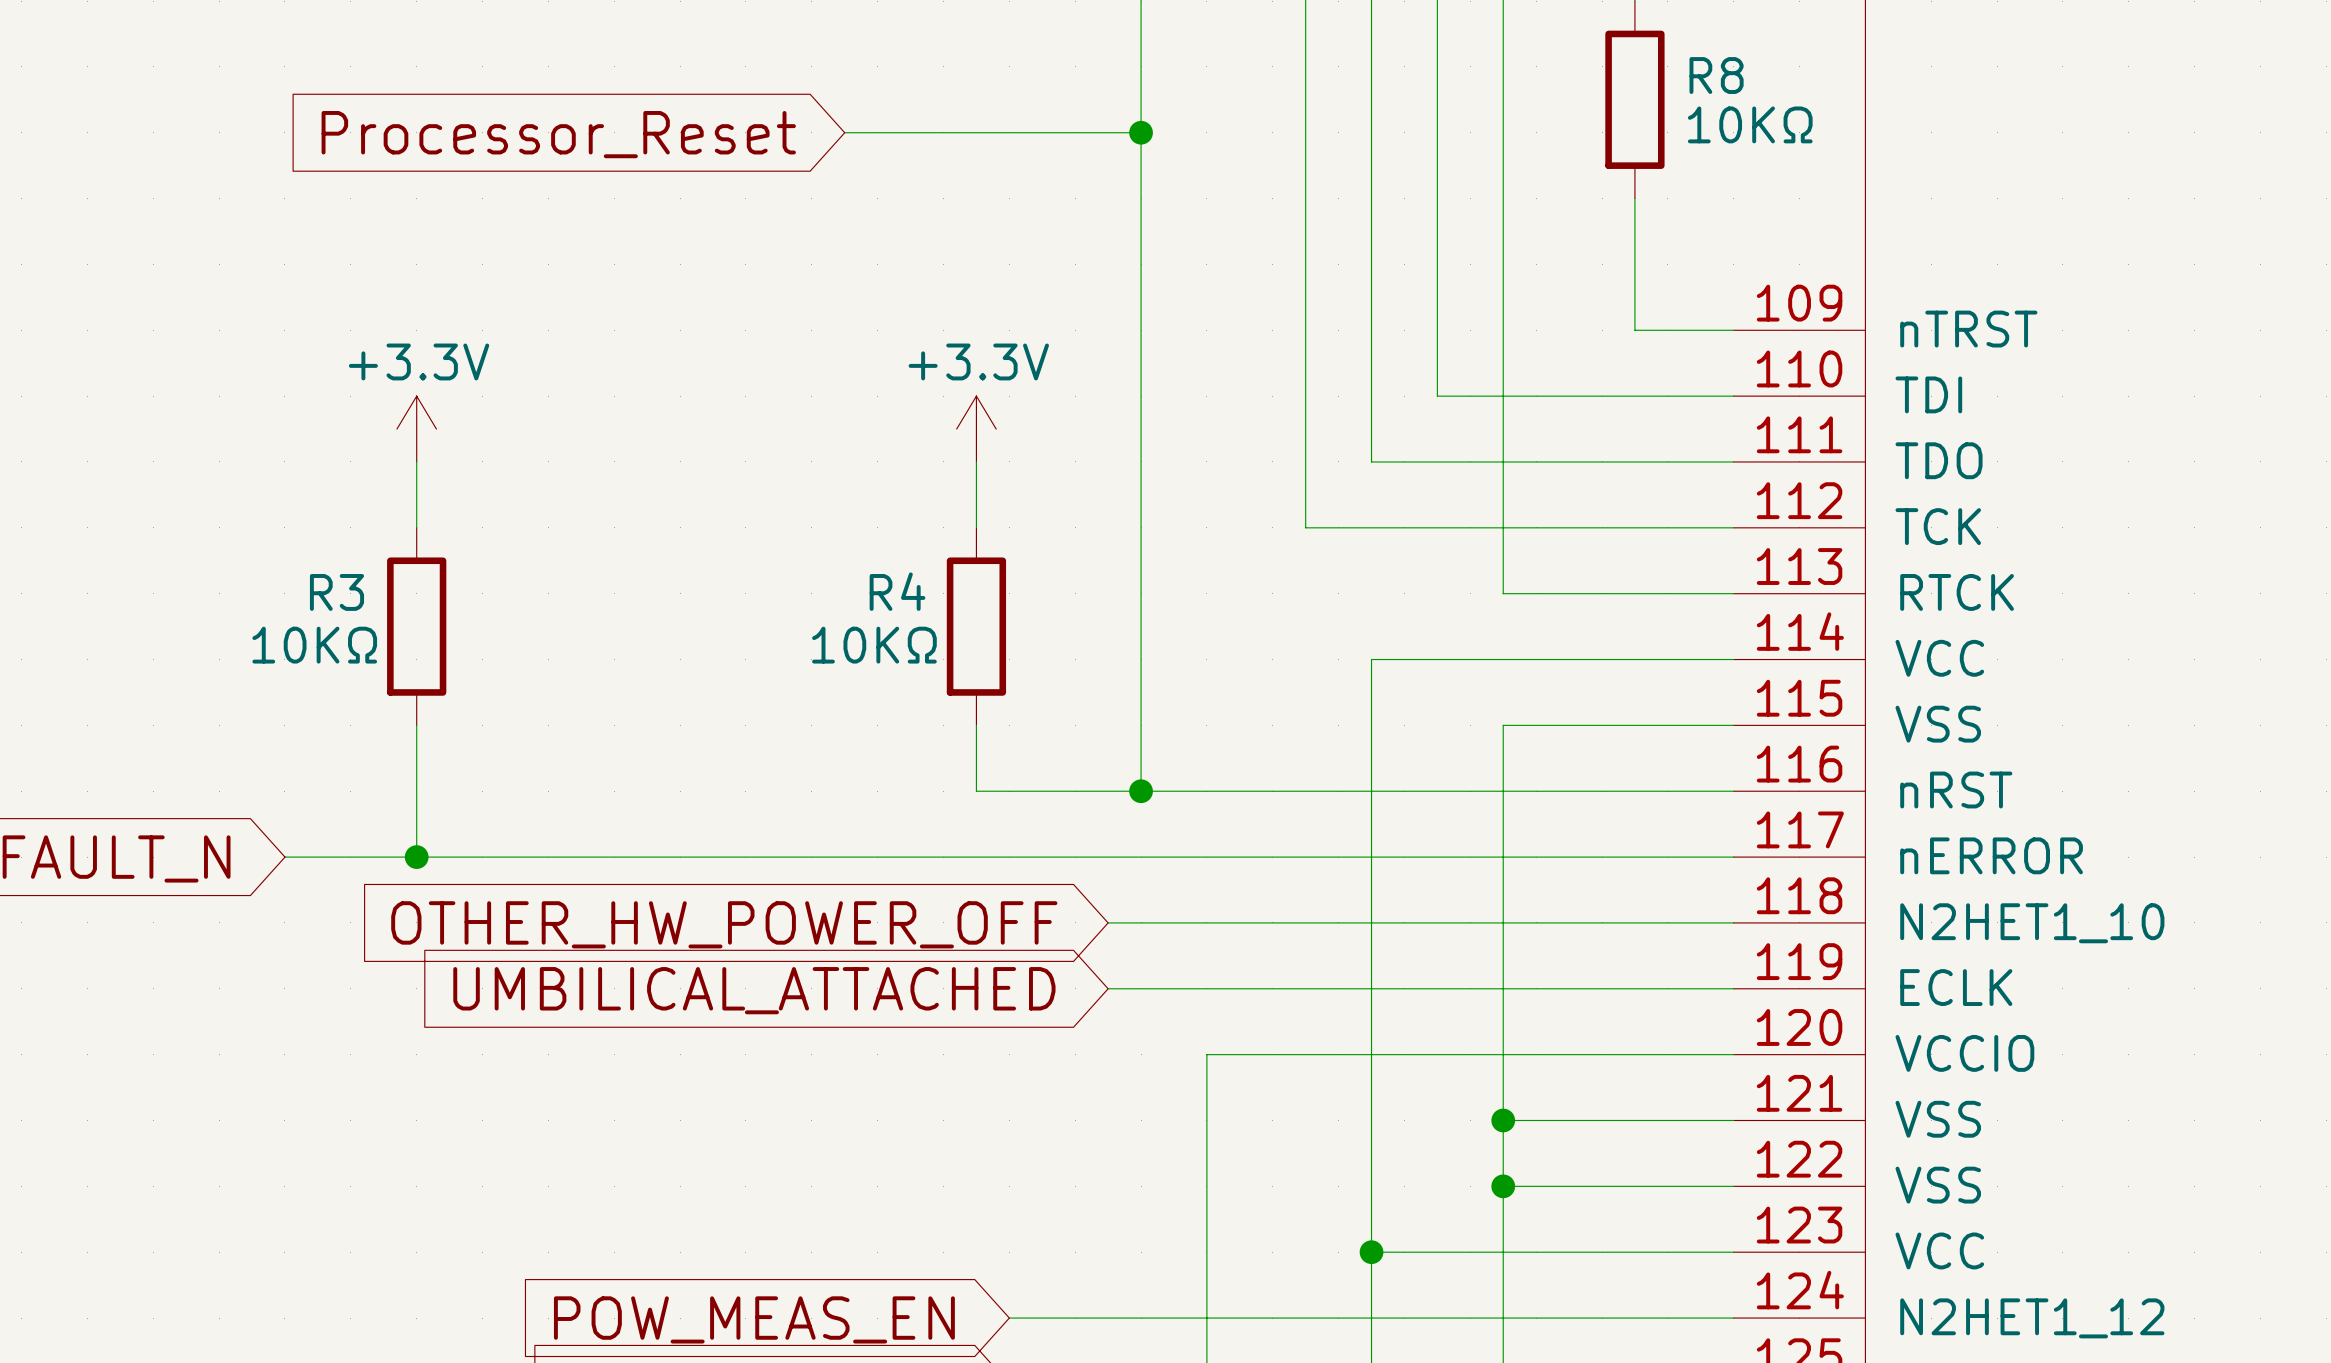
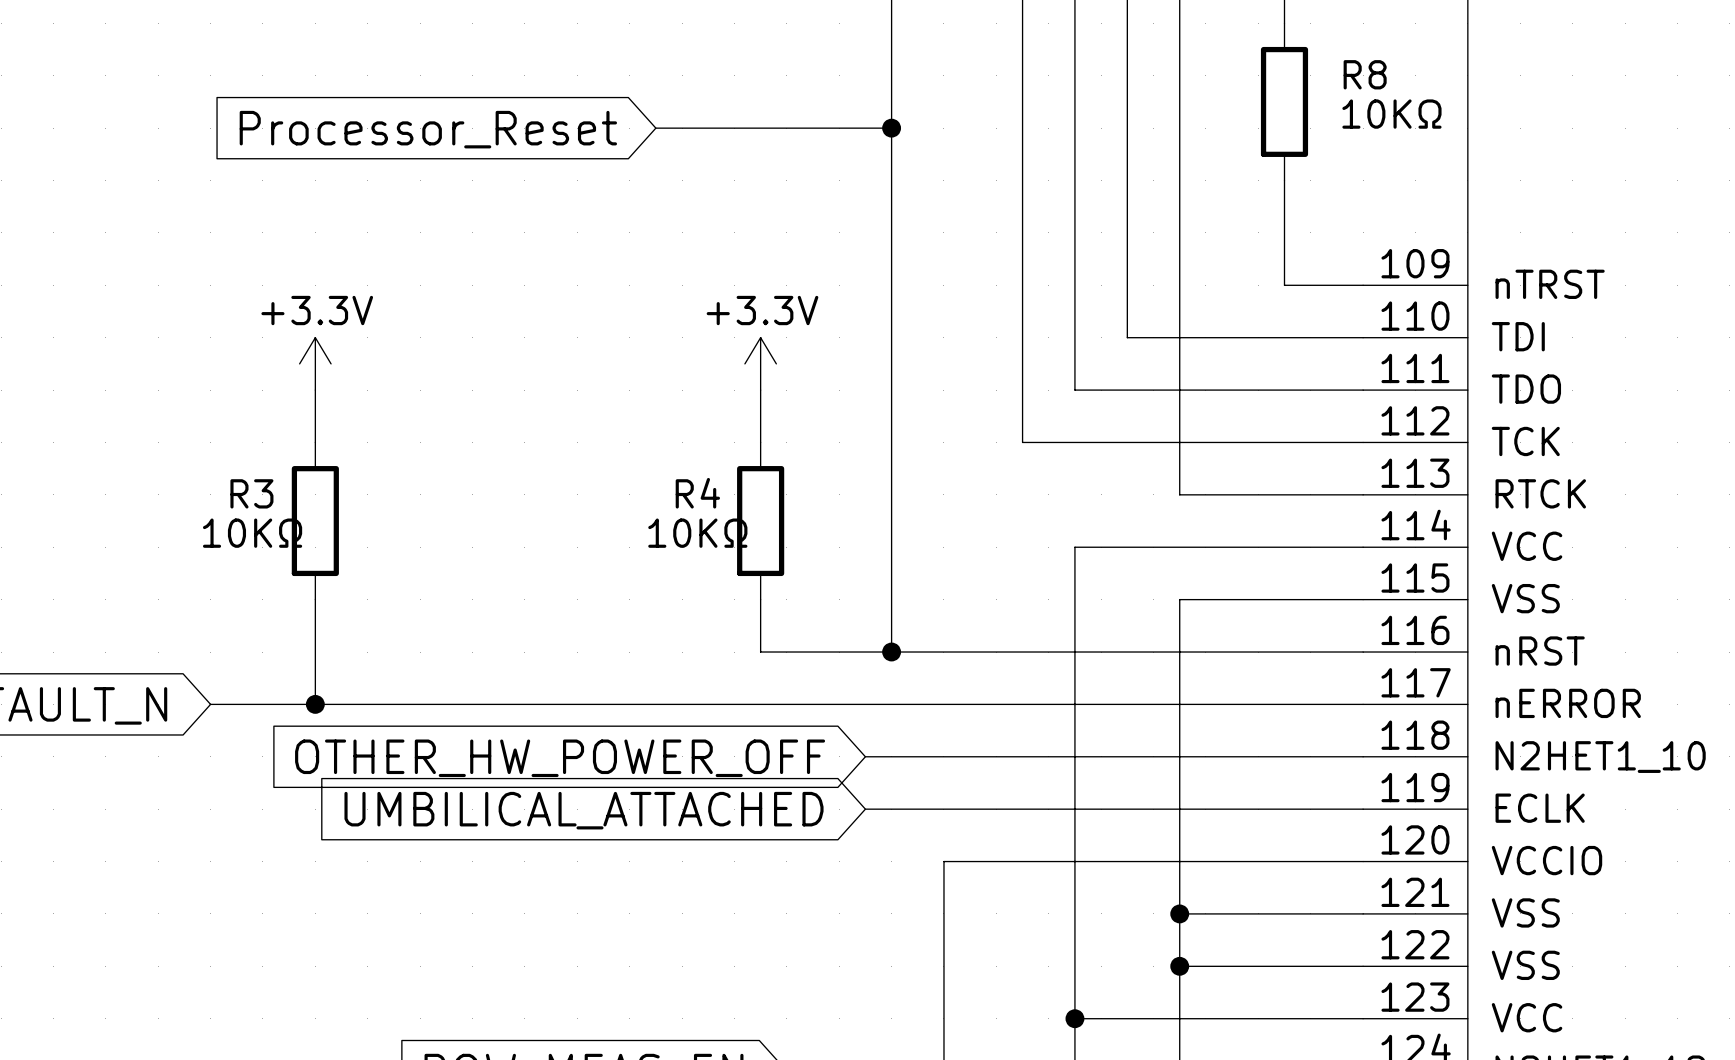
R8 name position: R8 (1716, 75) -> R8 (1365, 74)
R8 value position: 10KΩ (1750, 124) -> 10KΩ (1391, 114)
R3 value position: 10KΩ (314, 645) -> 10KΩ (252, 533)
R4 value position: 10KΩ (874, 645) -> 10KΩ (697, 533)

